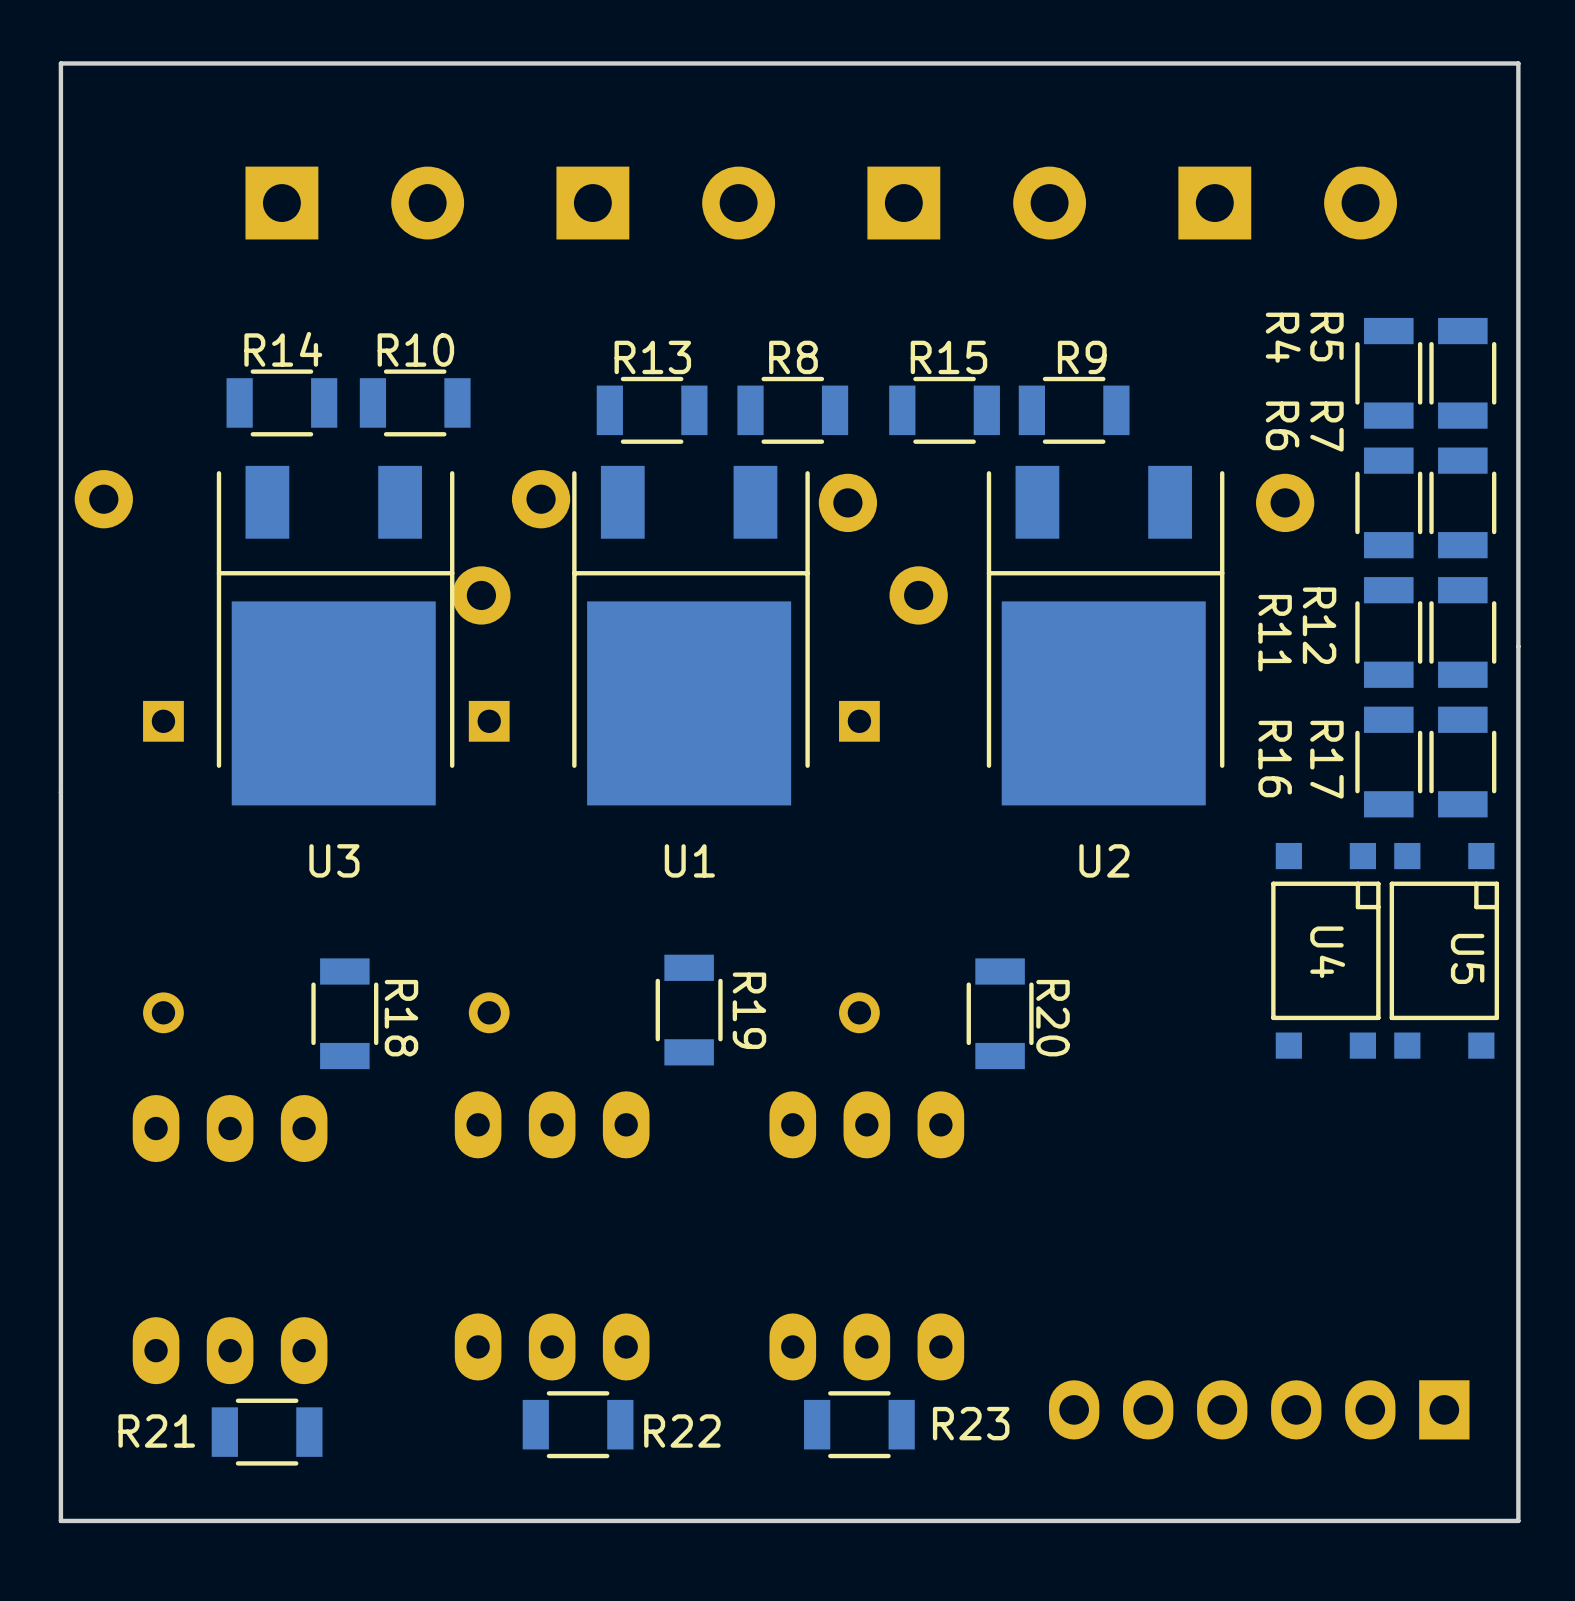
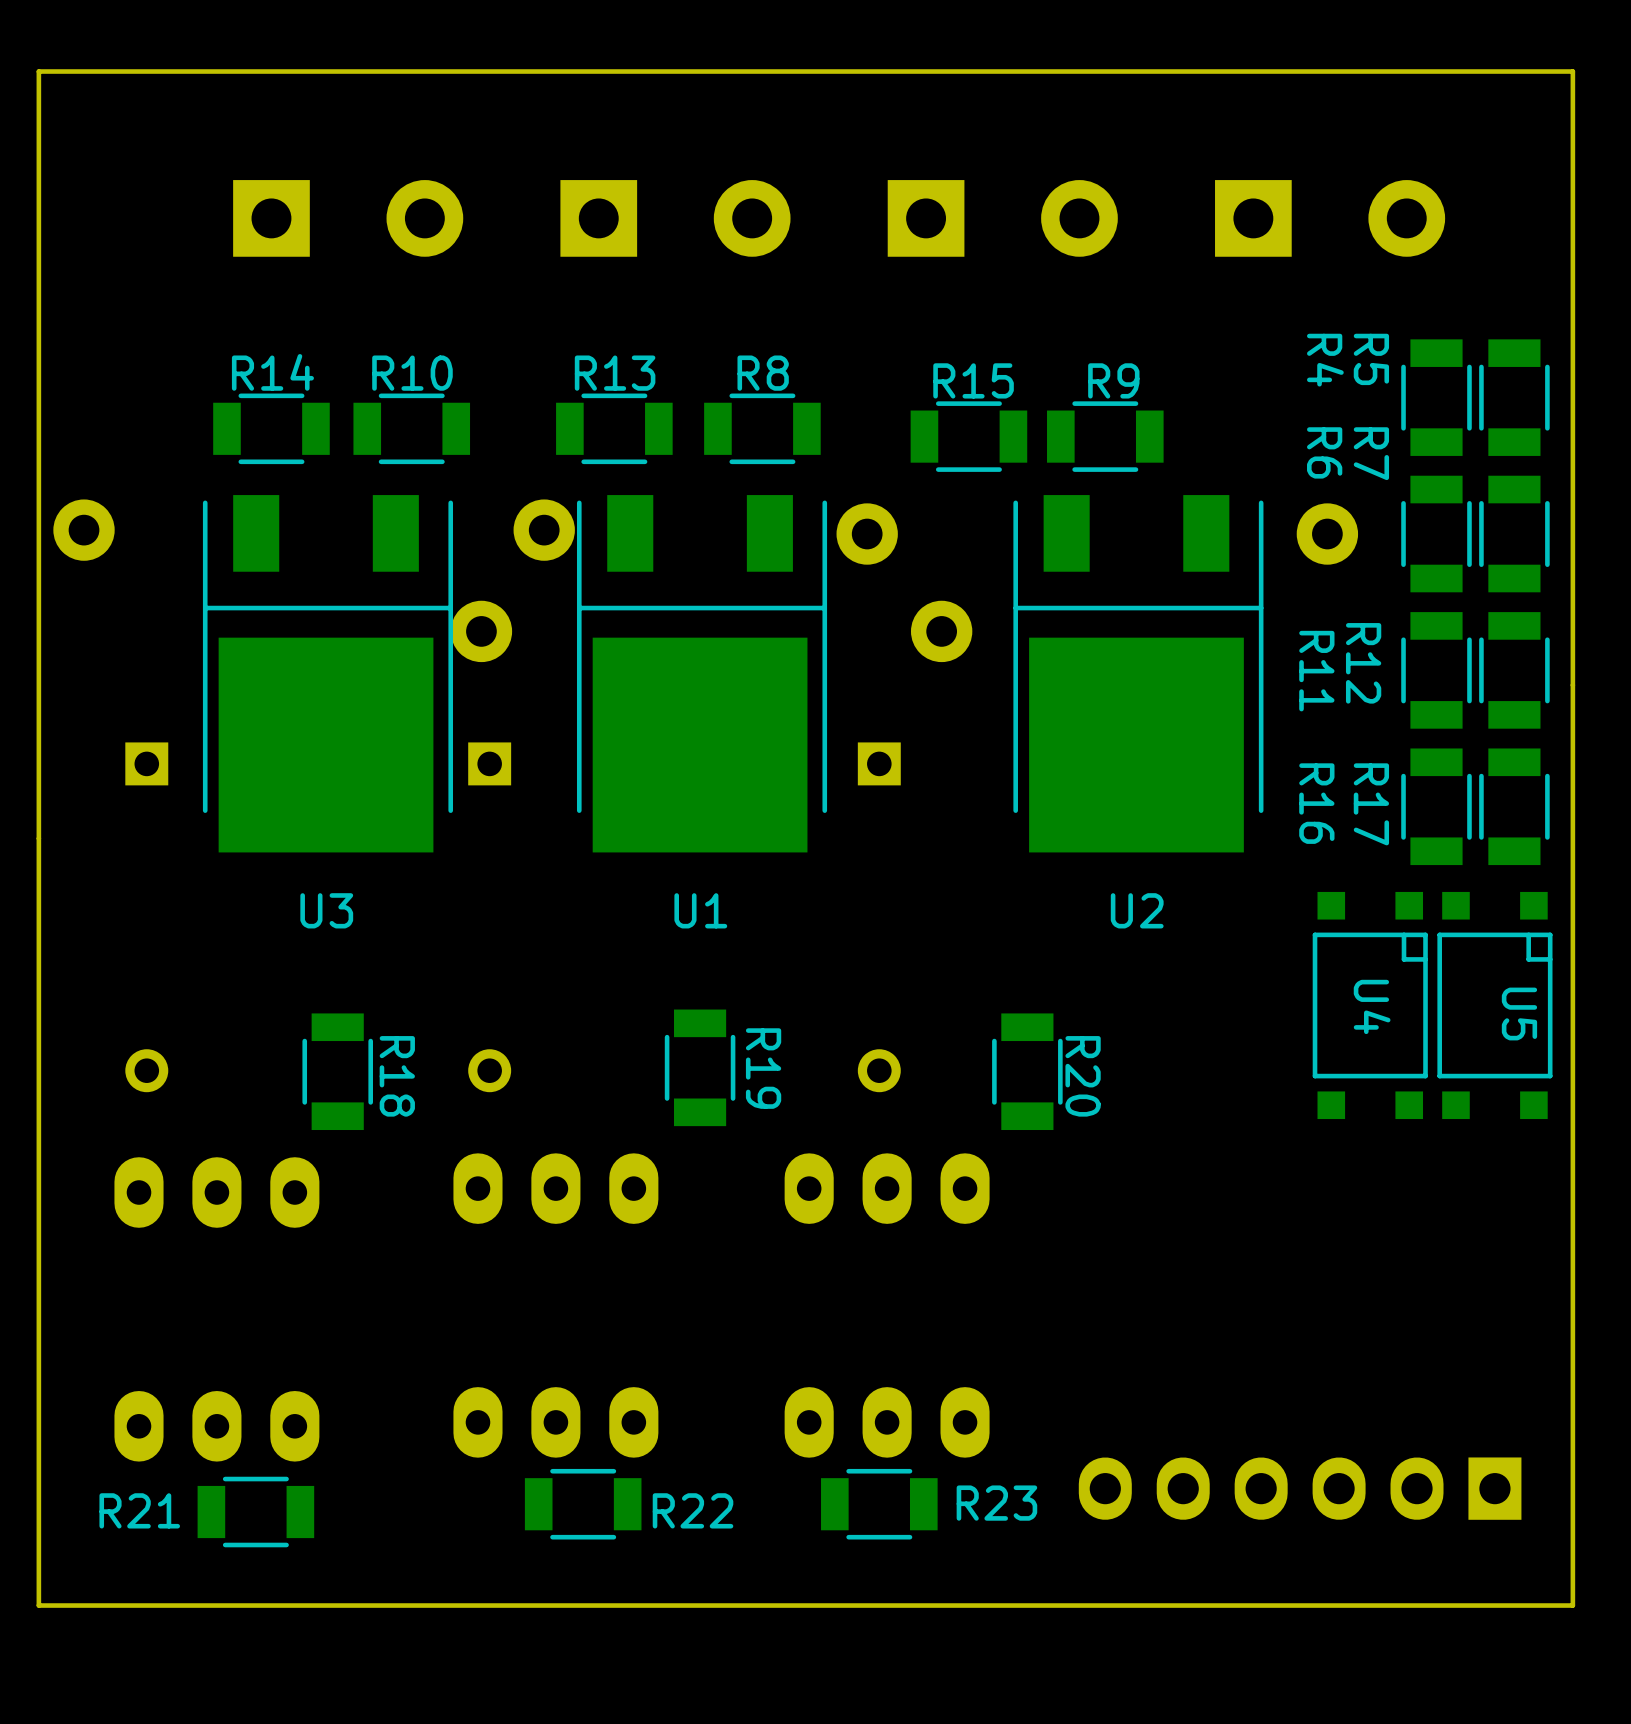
R13 position: (652, 410) -> (614, 428)
R8 position: (792, 410) -> (762, 428)

